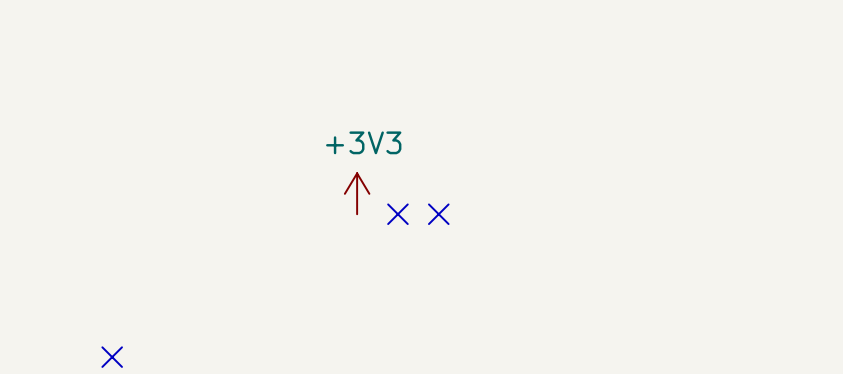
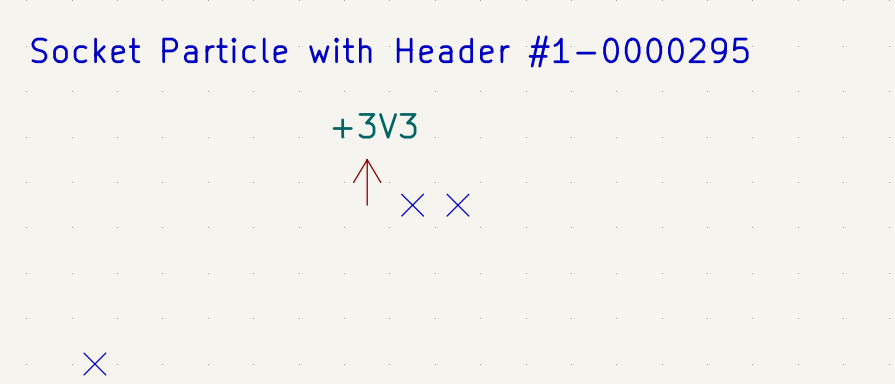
text: none -> Socket Particle with Header #1-0000295 (390, 51)

